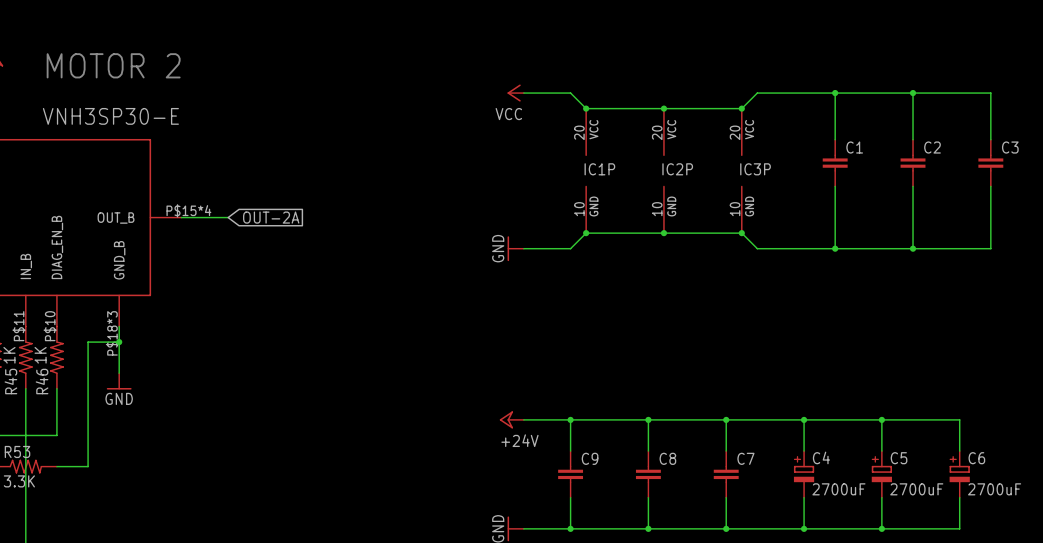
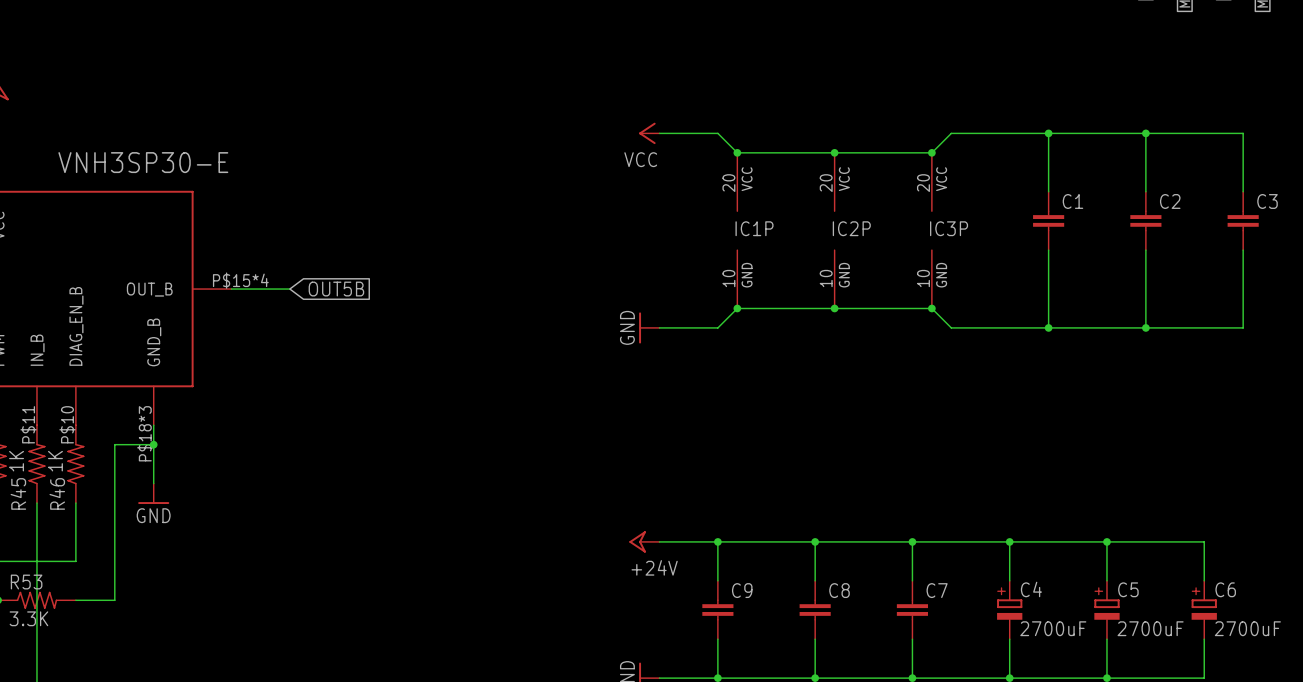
text: MOTOR 2 (113, 65) -> none
global label: OUT-2A (271, 217) -> OUT5B (336, 289)

